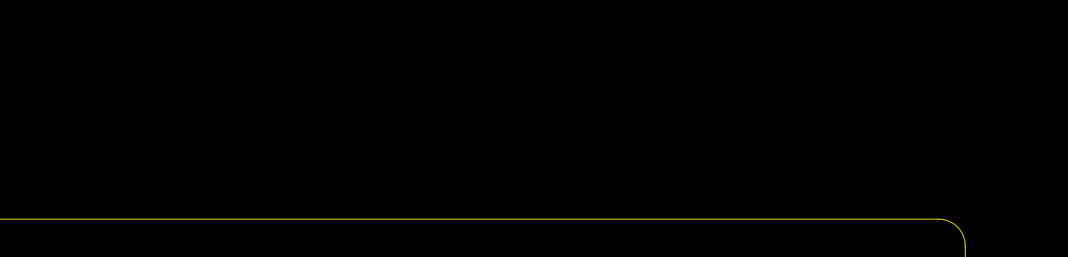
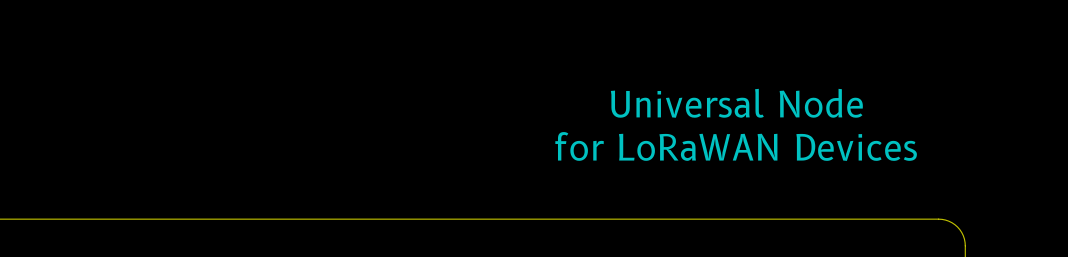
text: none -> Universal Node (736, 103)
text: none -> for LoRaWAN Devices (736, 146)

